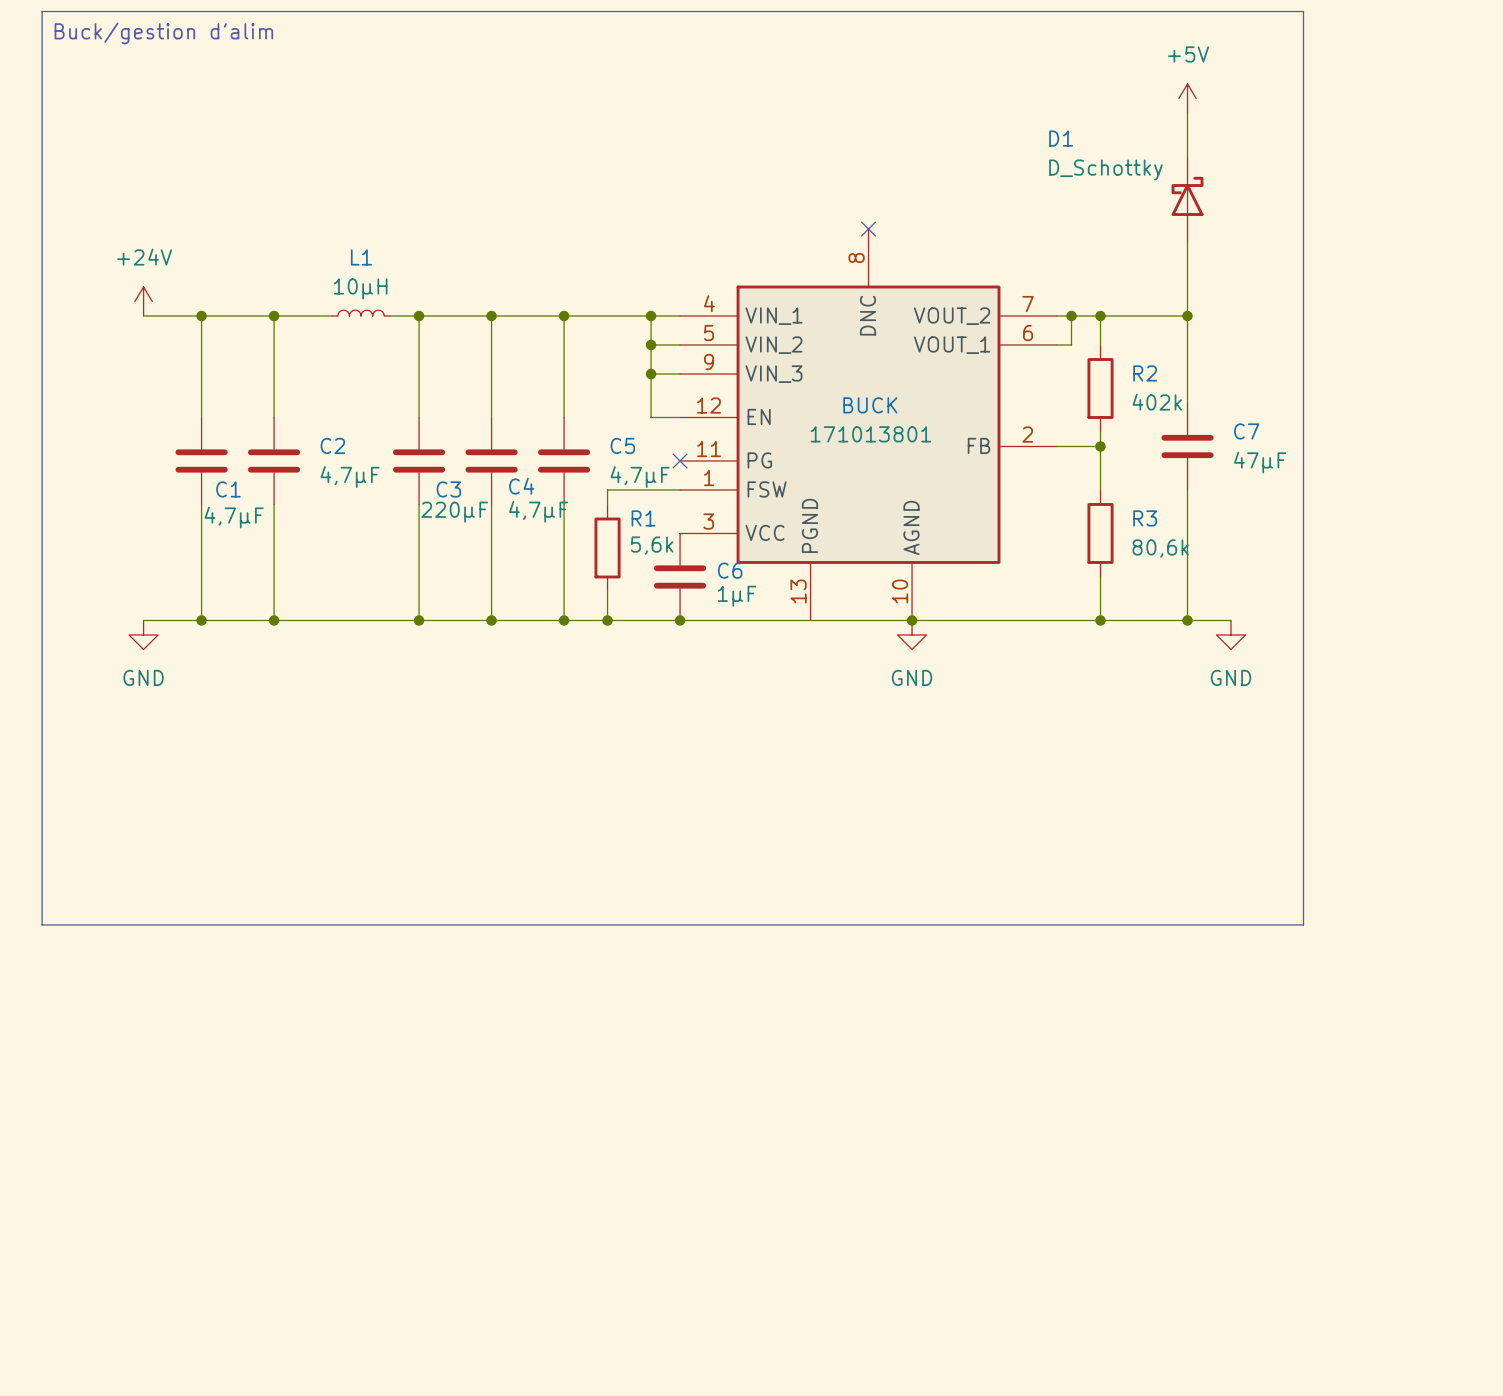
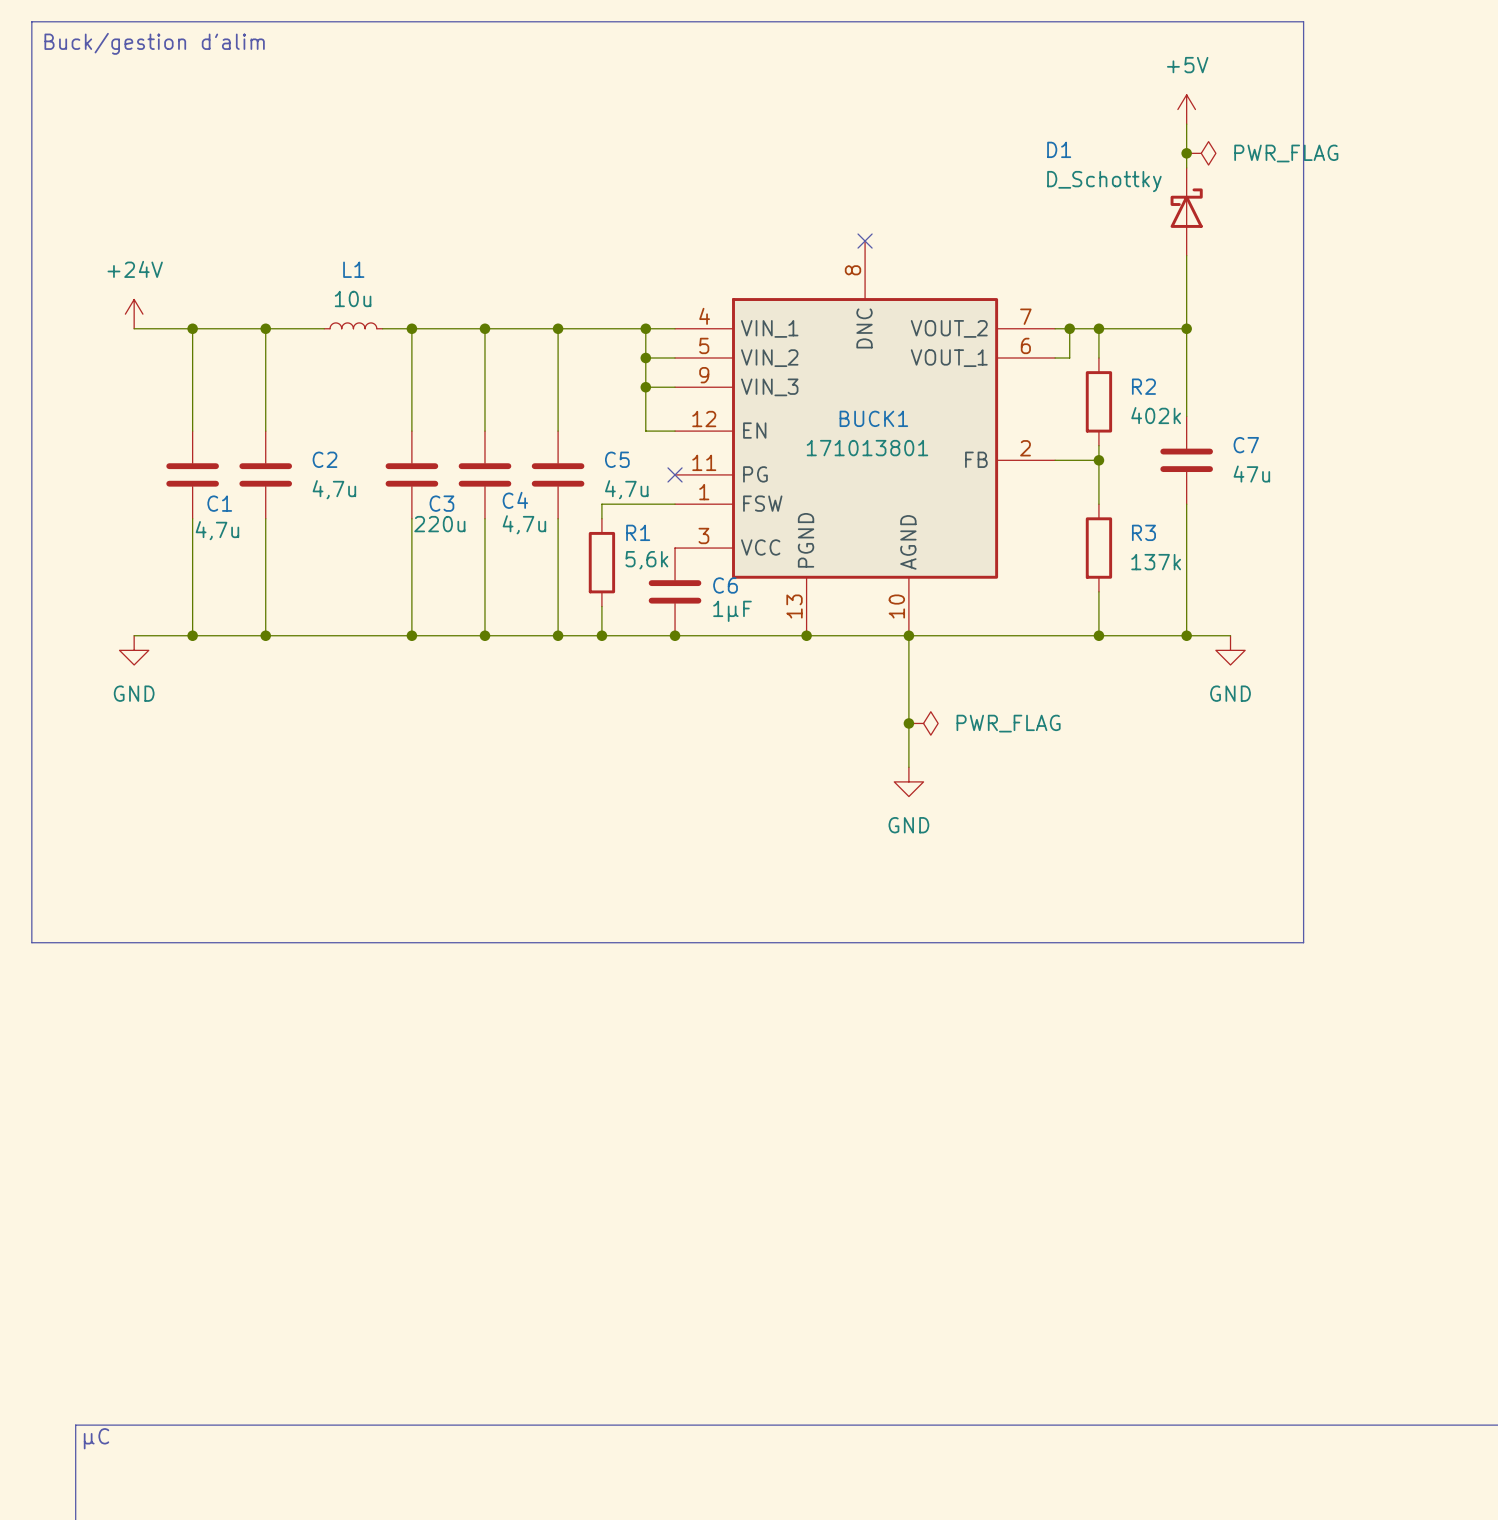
junction: none -> (1186, 153)
power symbol: none -> PWR_FLAG (1201, 153)
L1 value: 10µH (360, 288) -> 10u (353, 298)
BUCK name: BUCK (870, 405) -> BUCK1 (873, 418)
C7 value: 47µF (1260, 462) -> 47u (1251, 474)
C2 value: 4,7µF (350, 477) -> 4,7u (334, 489)
C5 value: 4,7µF (640, 477) -> 4,7u (626, 489)
C4 value: 4,7µF (538, 511) -> 4,7u (524, 524)
C3 value: 220µF (454, 512) -> 220u (439, 524)
C1 value: 4,7µF (234, 517) -> 4,7u (217, 530)
R3 value: 80,6k (1160, 548) -> 137k (1156, 562)
junction: none -> (806, 635)
wire: none -> (908, 635) (908, 767)
power symbol position: GND (912, 634) -> GND (908, 781)
junction: none -> (908, 723)
power symbol: none -> PWR_FLAG (923, 723)

